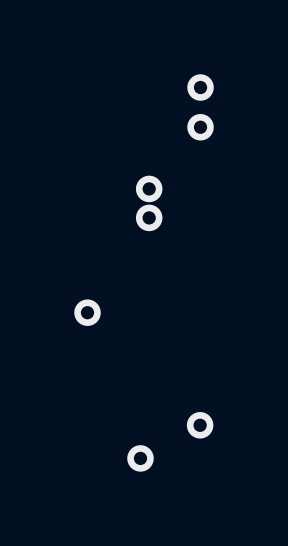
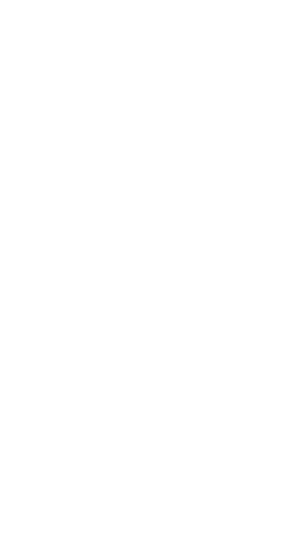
via: (200, 87) -> none
via: (200, 127) -> none
via: (149, 188) -> none
via: (149, 217) -> none
via: (87, 312) -> none
via: (200, 425) -> none
via: (140, 458) -> none

